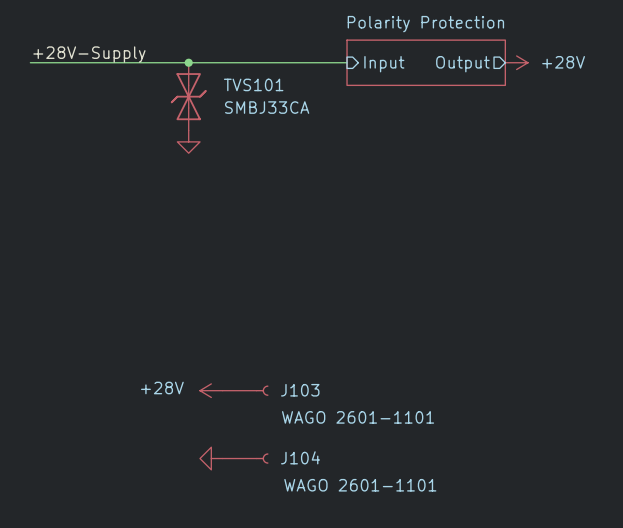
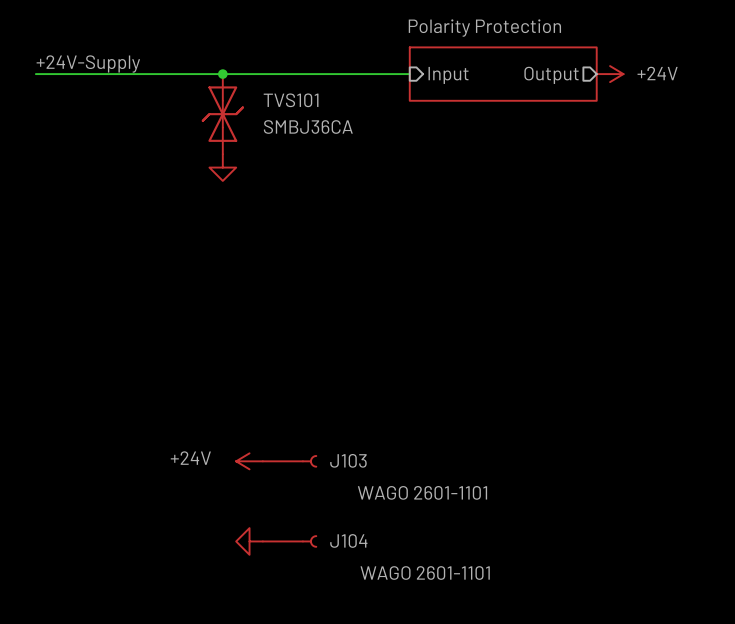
label: +28V-Supply (89, 54) -> +24V-Supply (88, 64)
power symbol: +28V (516, 62) -> +24V (610, 74)
TVS101 value: SMBJ33CA (267, 107) -> SMBJ36CA (308, 127)
power symbol: +28V (211, 390) -> +24V (249, 461)

